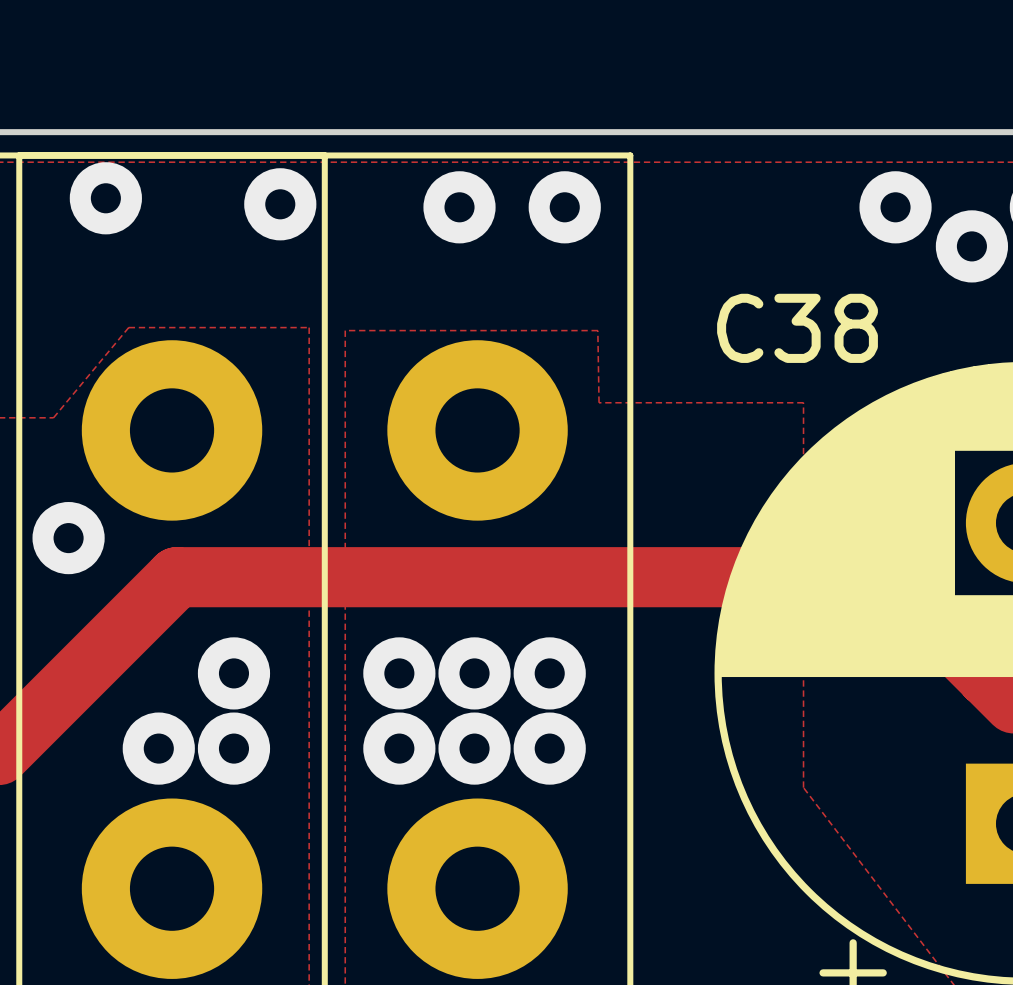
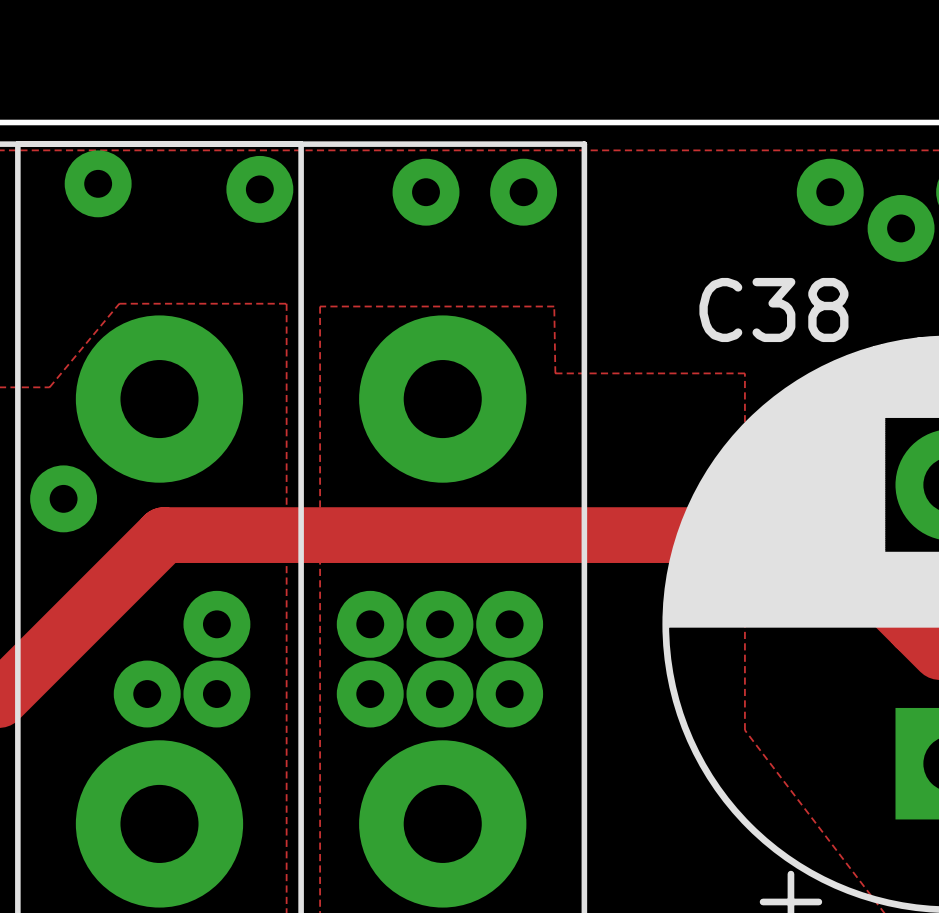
C38 name position: C38 (797, 328) -> C38 (773, 309)

